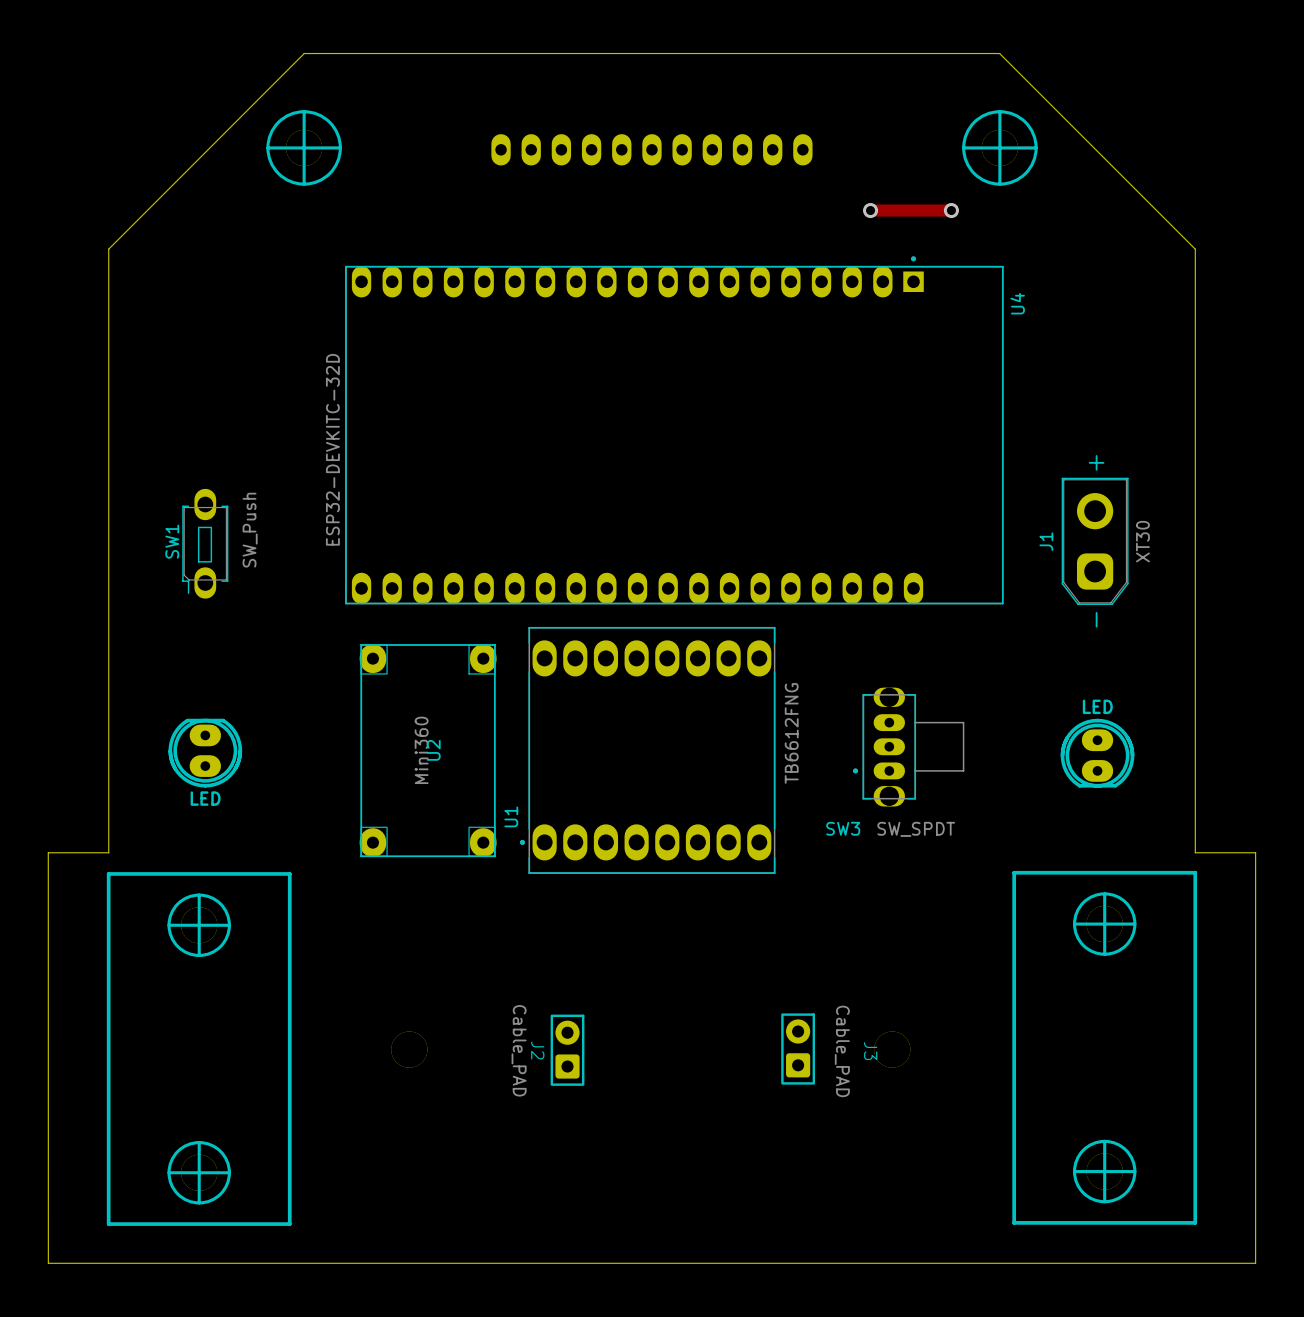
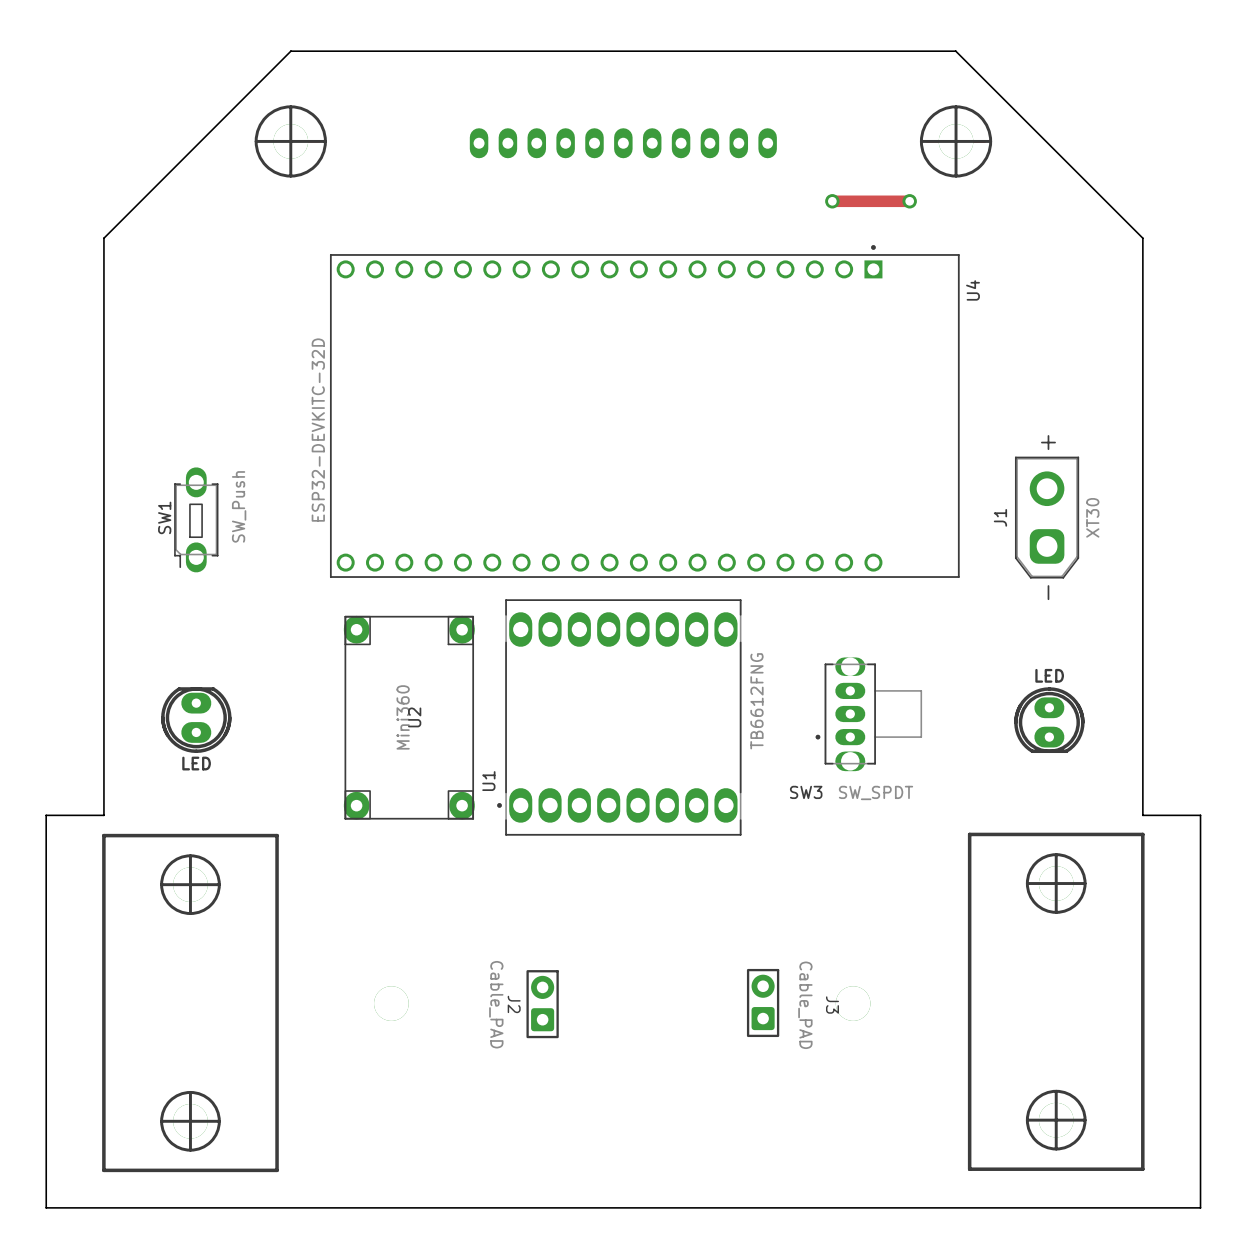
U4 footprint: [345, 256, 1004, 605] -> [330, 245, 960, 578]

